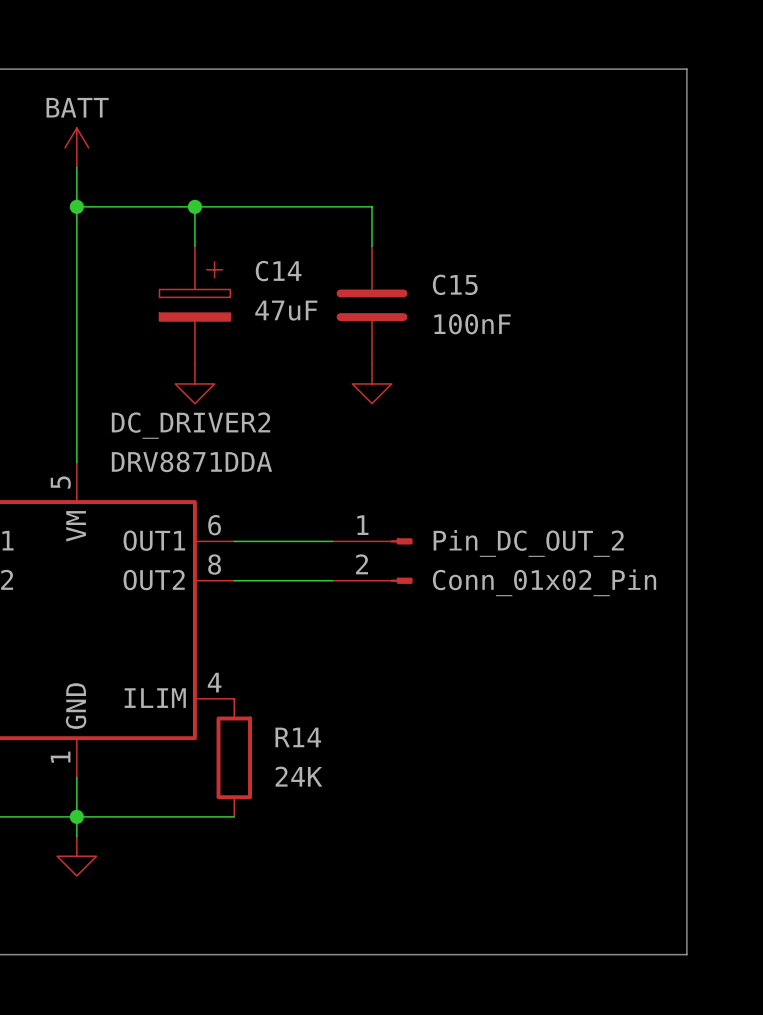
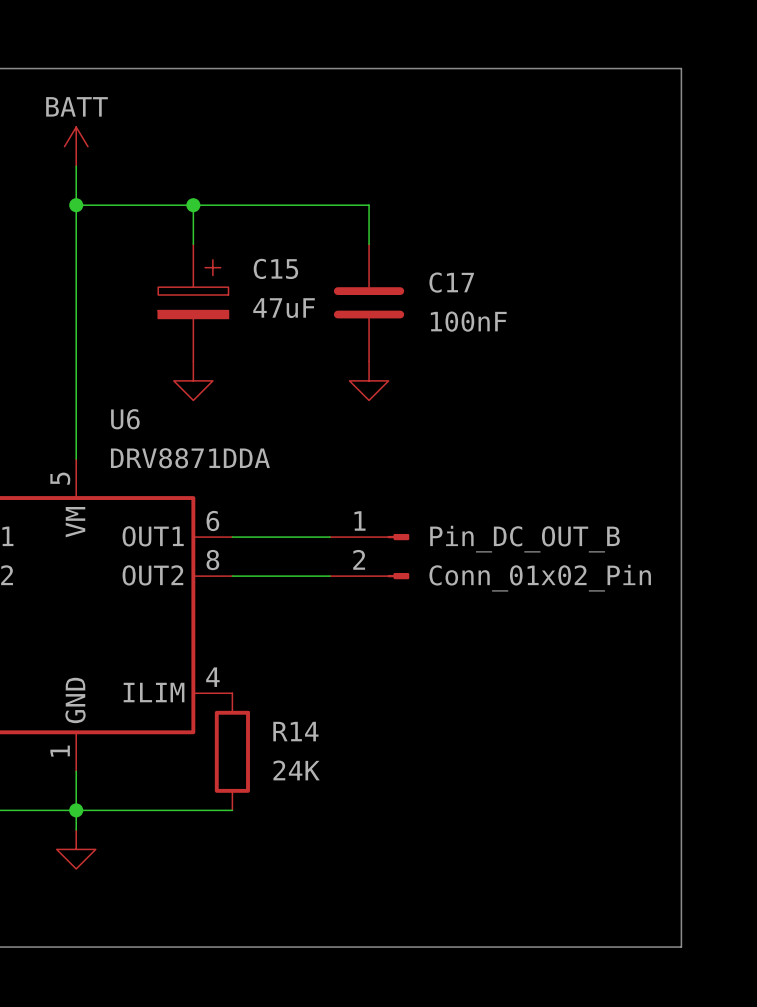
C14 name: C14 (278, 271) -> C15 (275, 268)
C15 name: C15 (455, 284) -> C17 (451, 282)
DC_DRIVER2 name: DC_DRIVER2 (191, 425) -> U6 (125, 419)
Pin_DC_OUT_2 name: Pin_DC_OUT_2 (528, 543) -> Pin_DC_OUT_B (525, 539)

